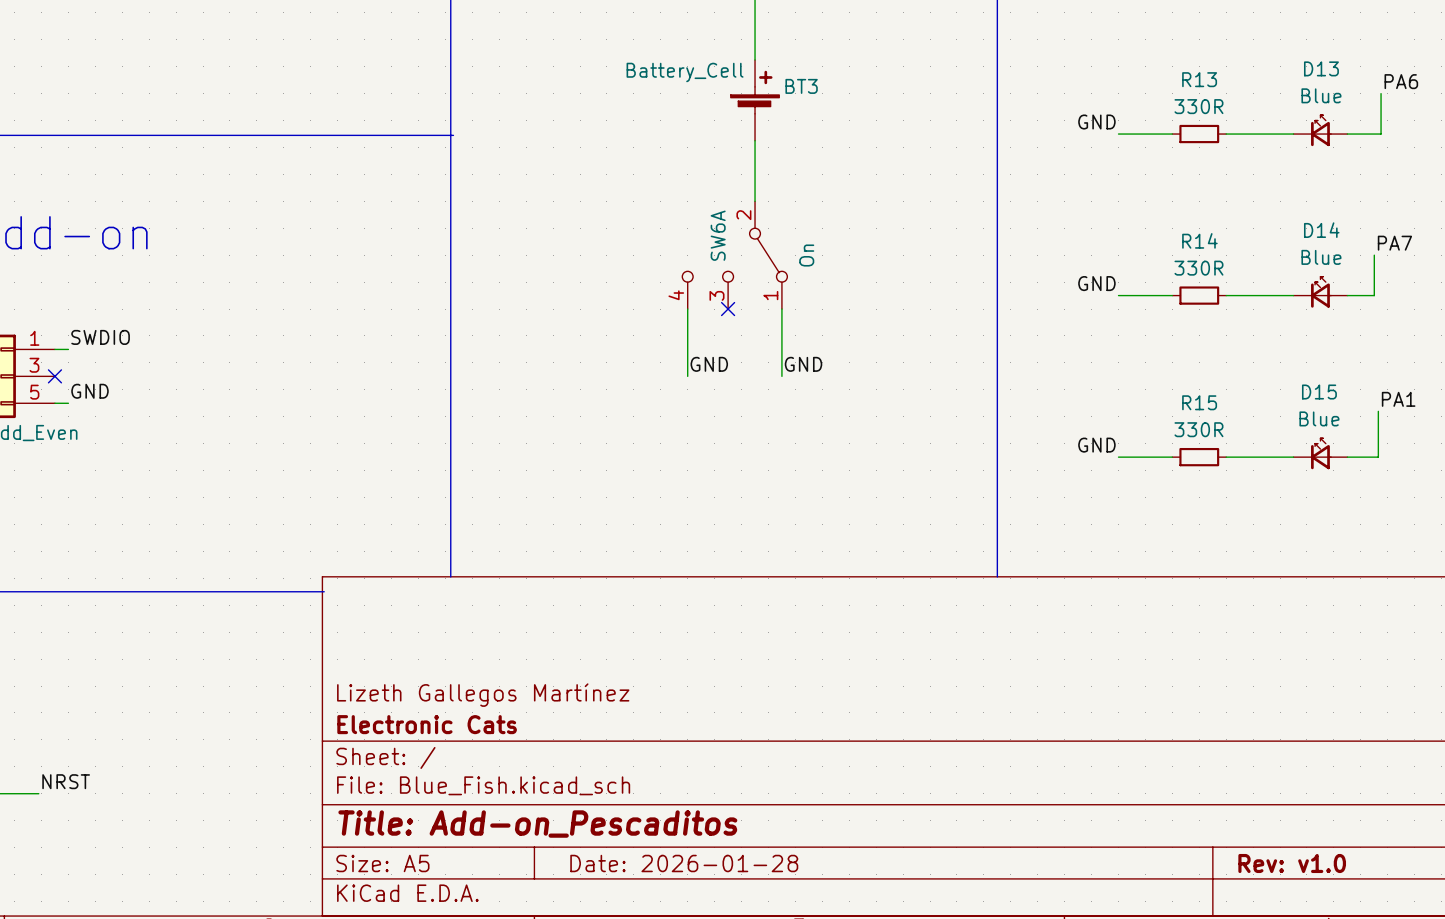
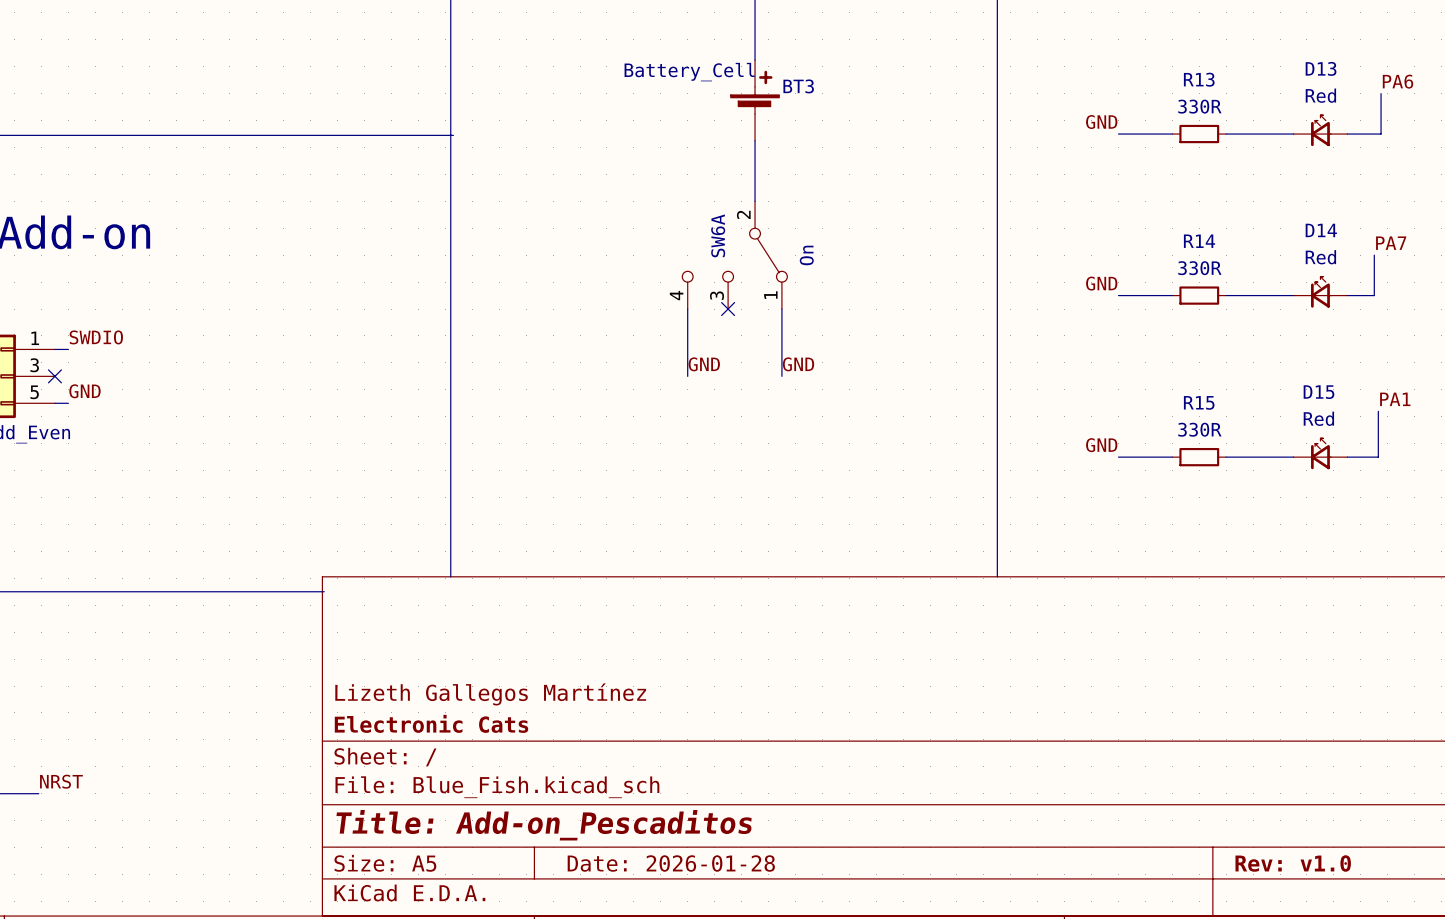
D13 value: Blue (1321, 95) -> Red (1320, 95)
D14 value: Blue (1321, 257) -> Red (1320, 257)
D15 value: Blue (1319, 418) -> Red (1318, 418)

